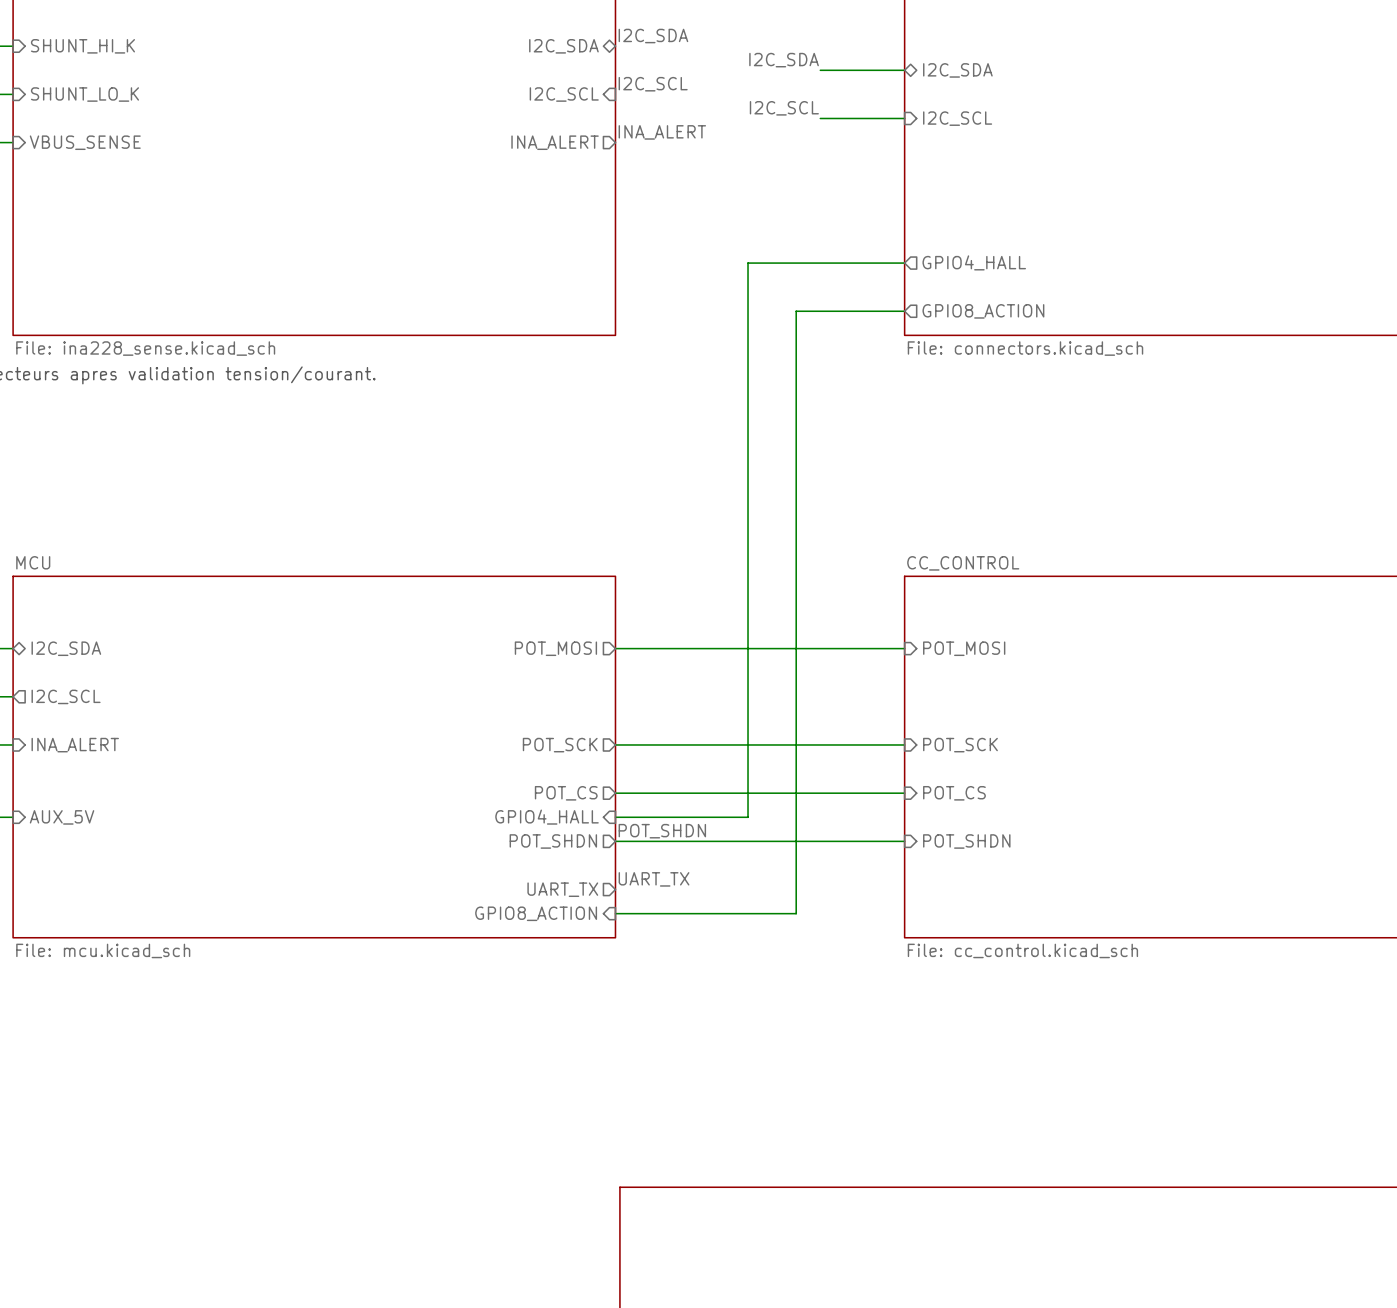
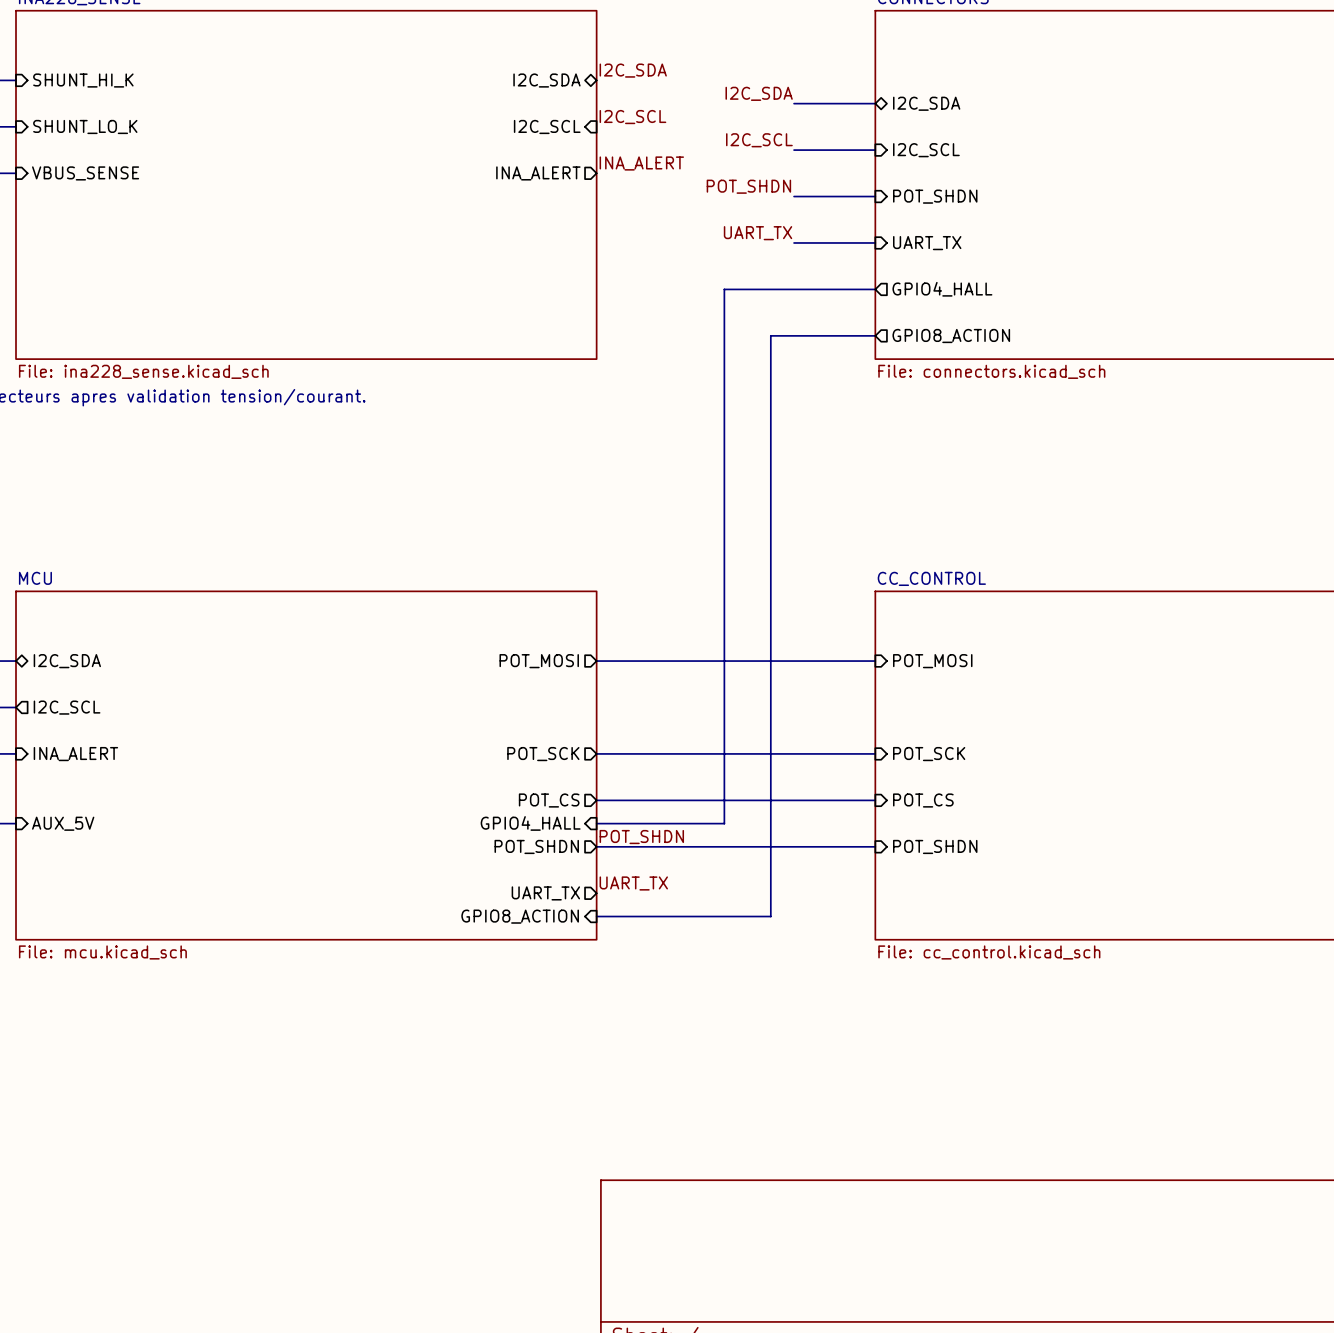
label: none -> POT_SHDN (748, 186)
wire: none -> (794, 196) (875, 196)
sheet pin: none -> POT_SHDN (935, 196)
label: none -> UART_TX (758, 233)
wire: none -> (794, 242) (875, 242)
sheet pin: none -> UART_TX (927, 243)

